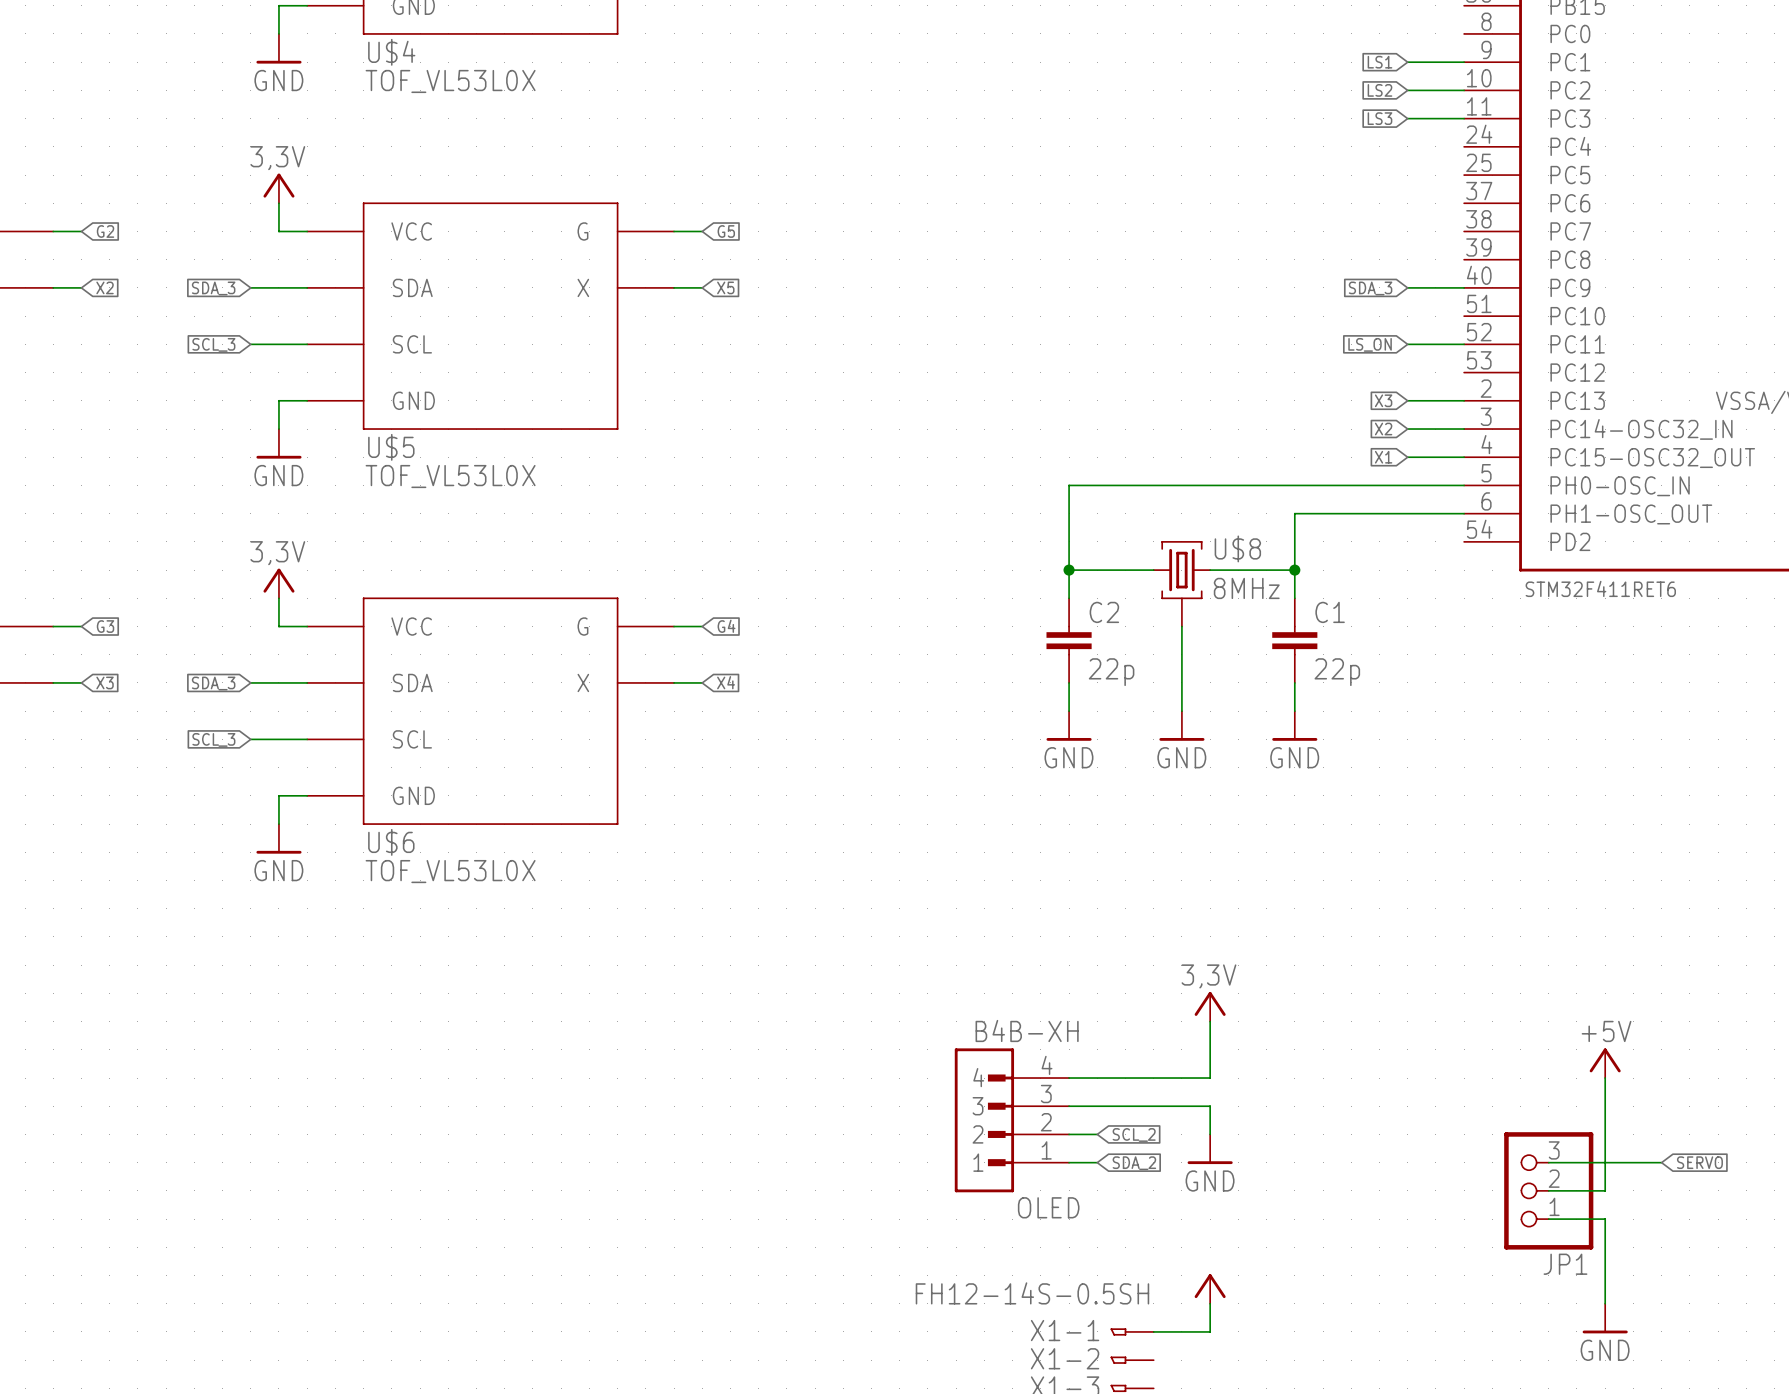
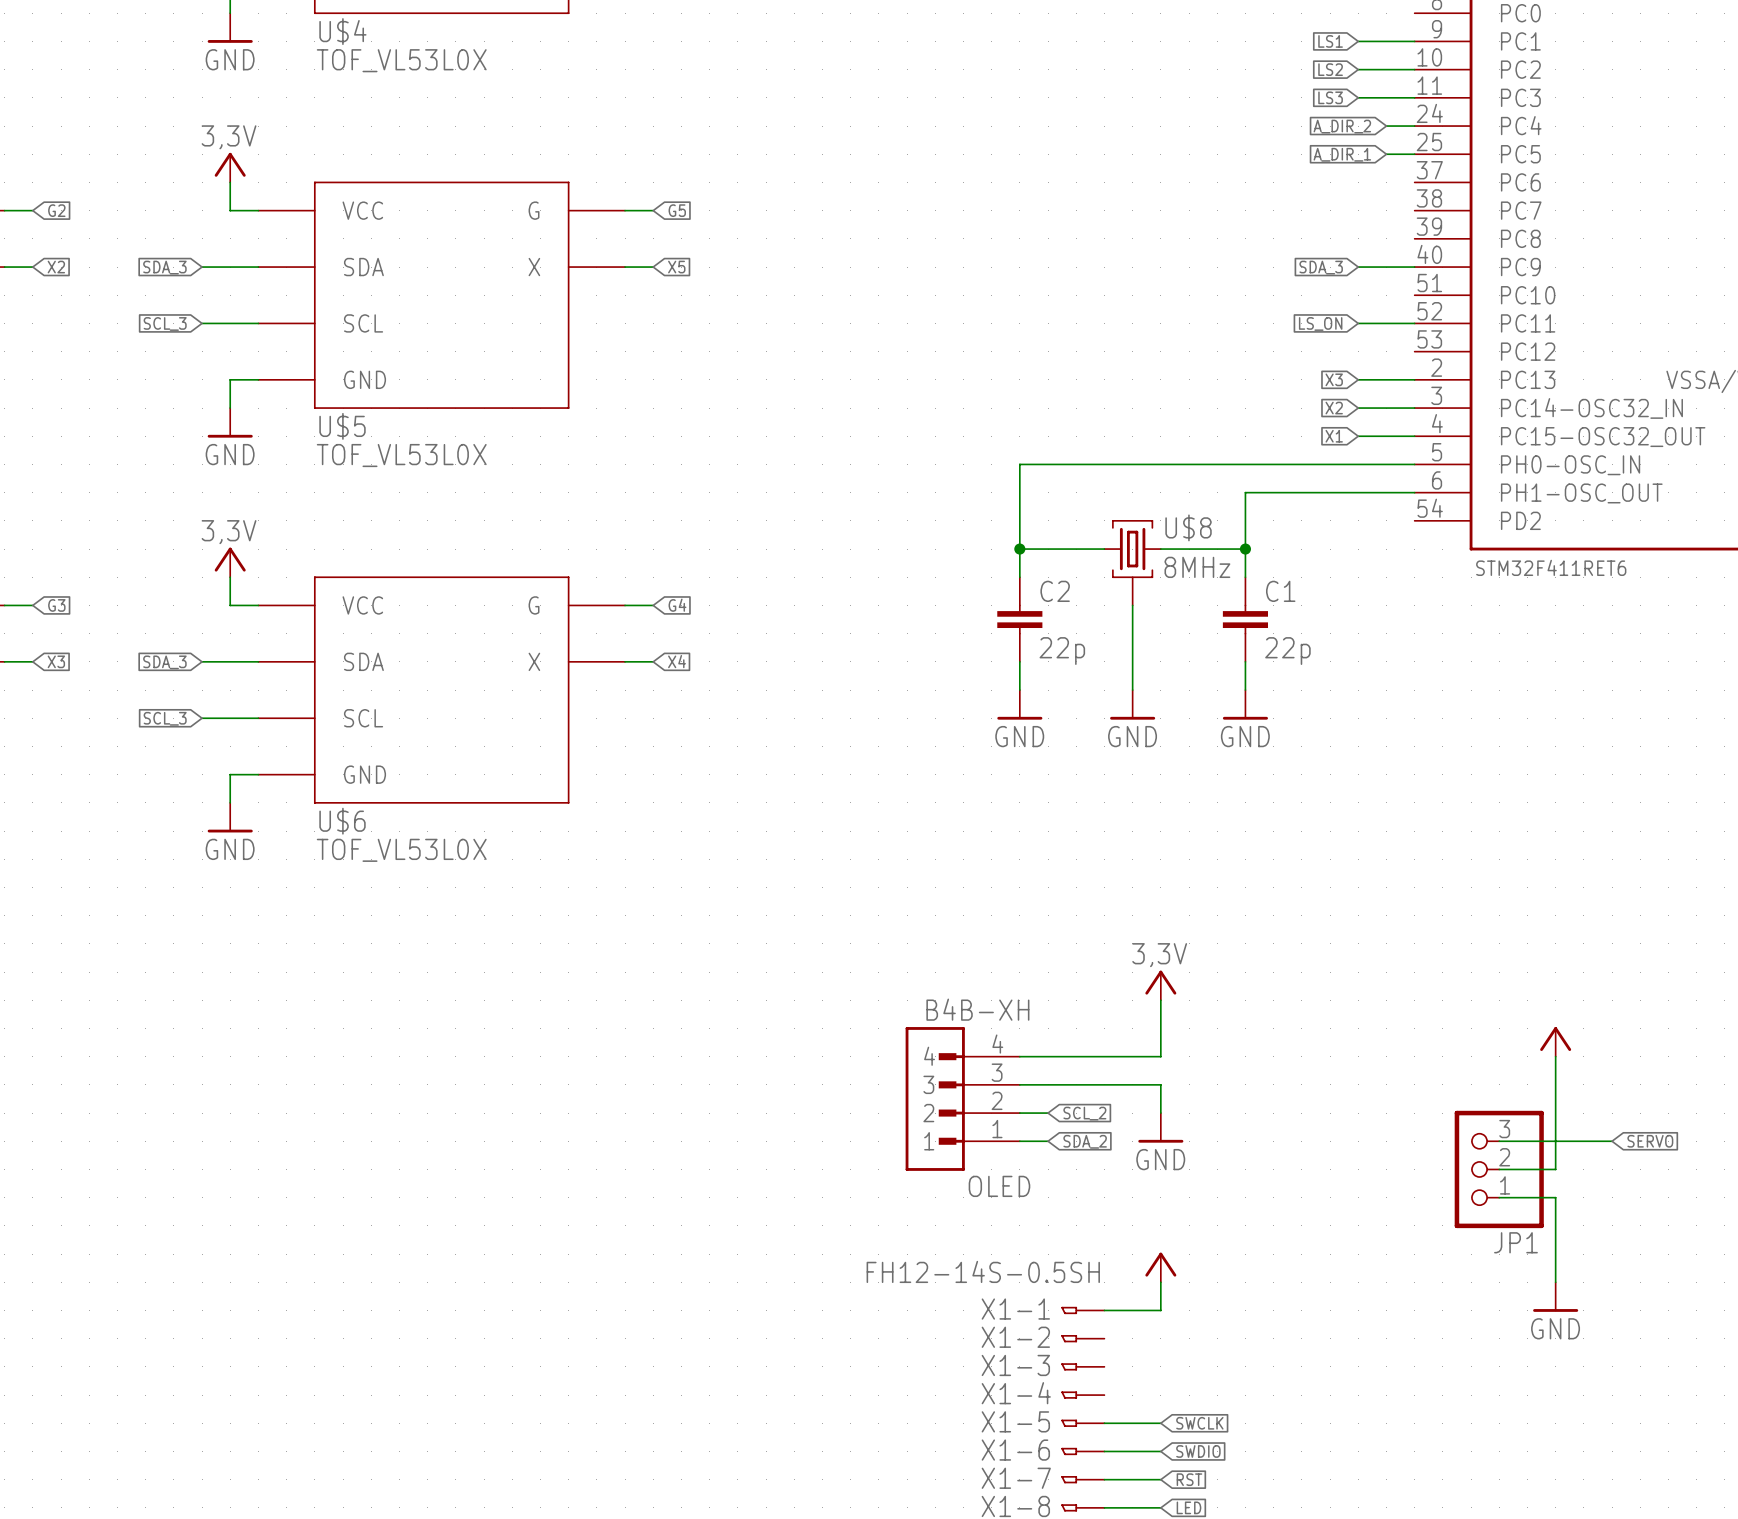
wire: none -> (1386, 126) (1414, 126)
global label: none -> A_DIR_2 (1342, 126)
global label: none -> A_DIR_1 (1342, 154)
wire: none -> (1386, 154) (1414, 154)
label: +5V (1606, 1031) -> none

